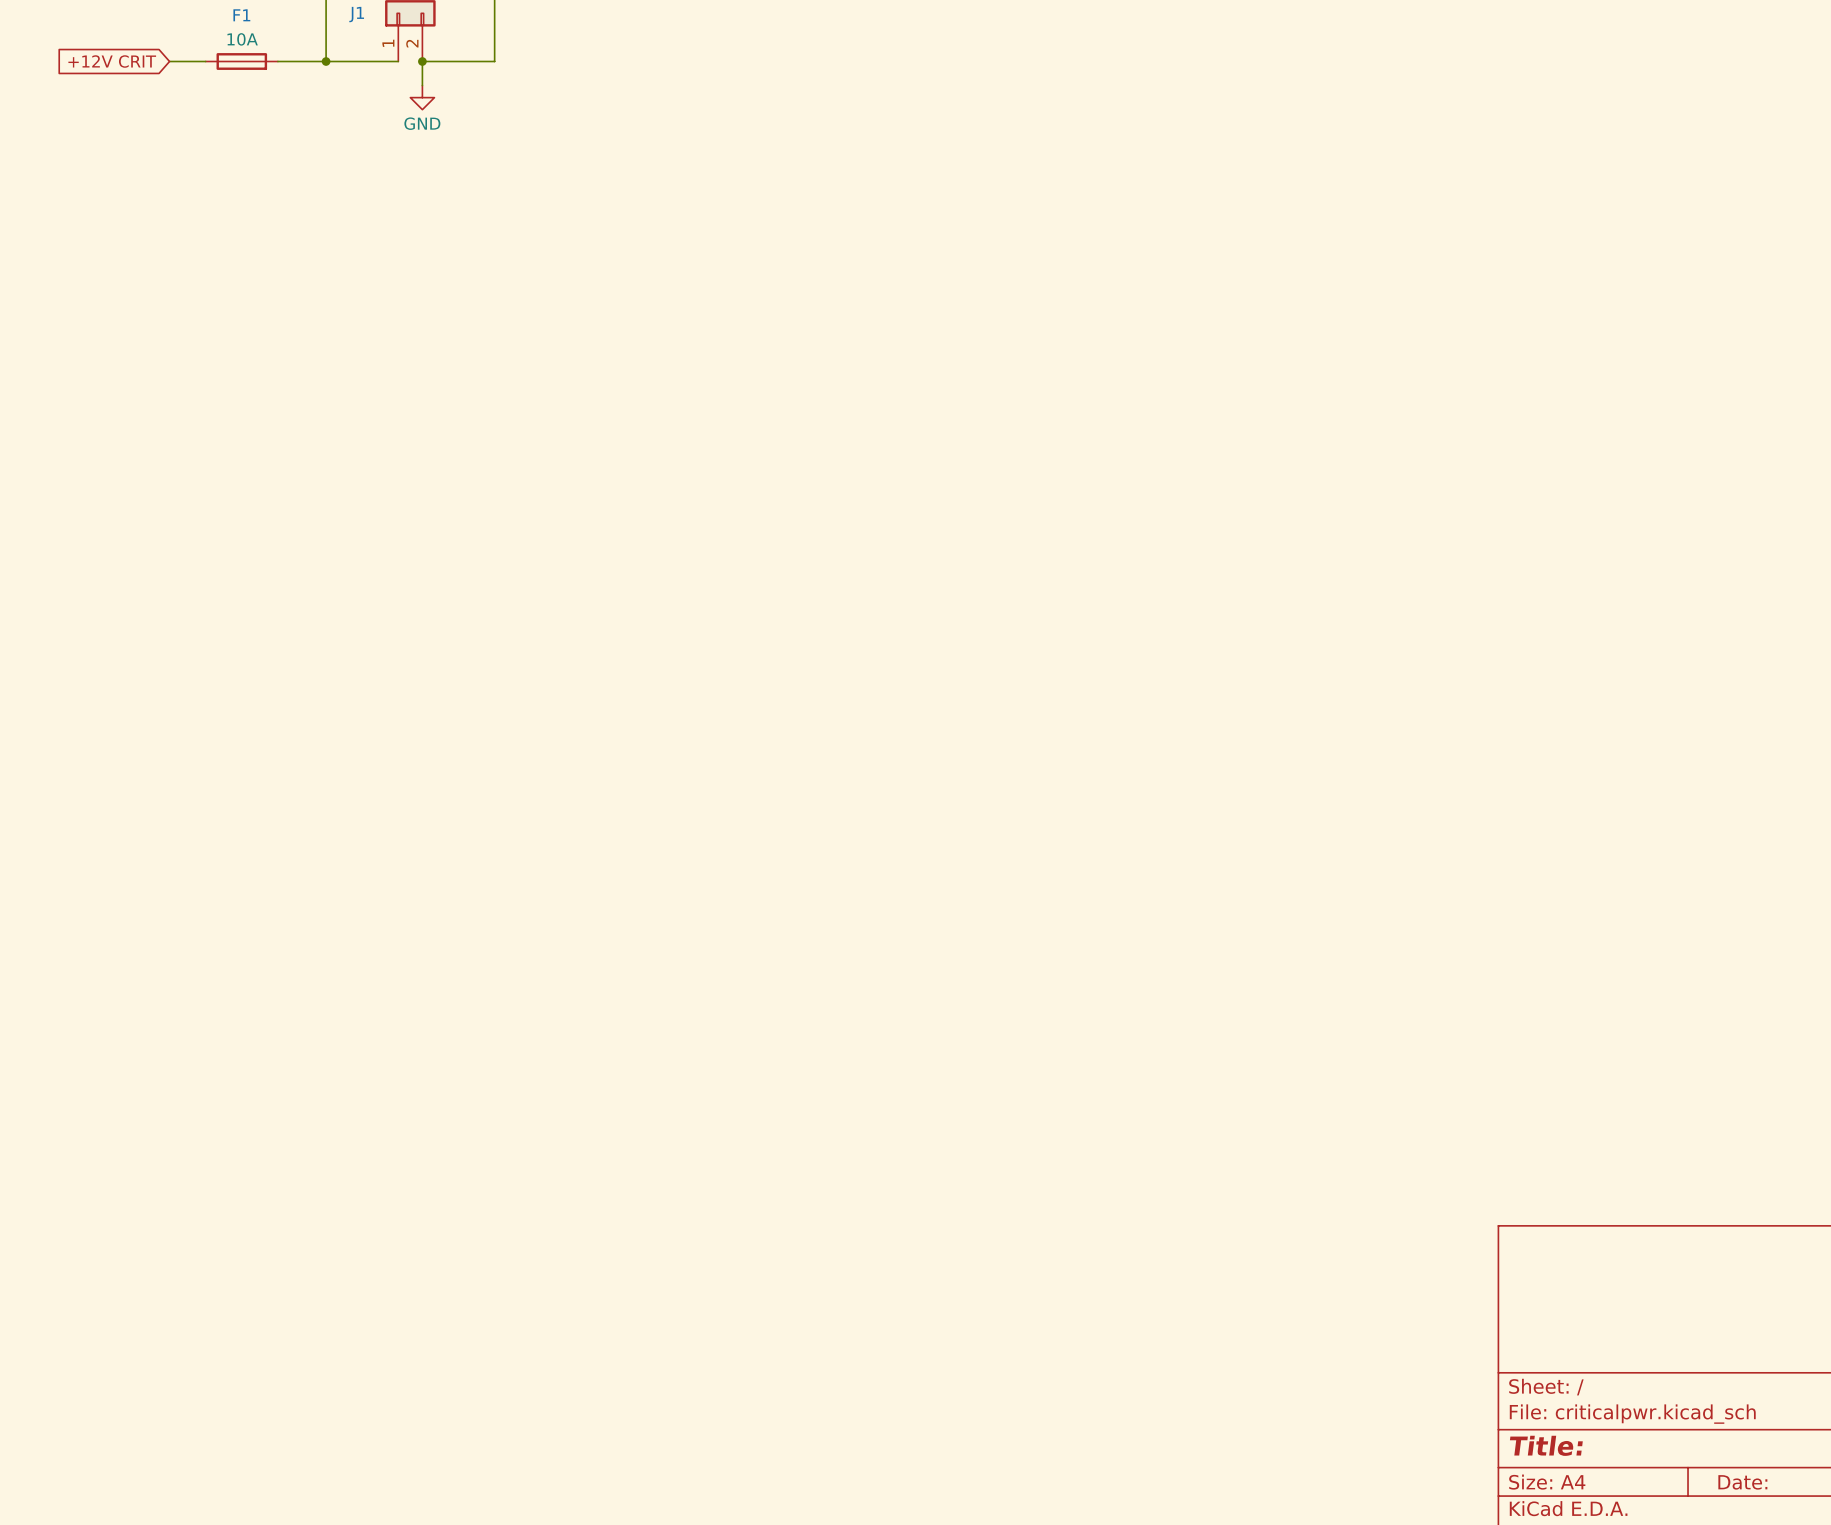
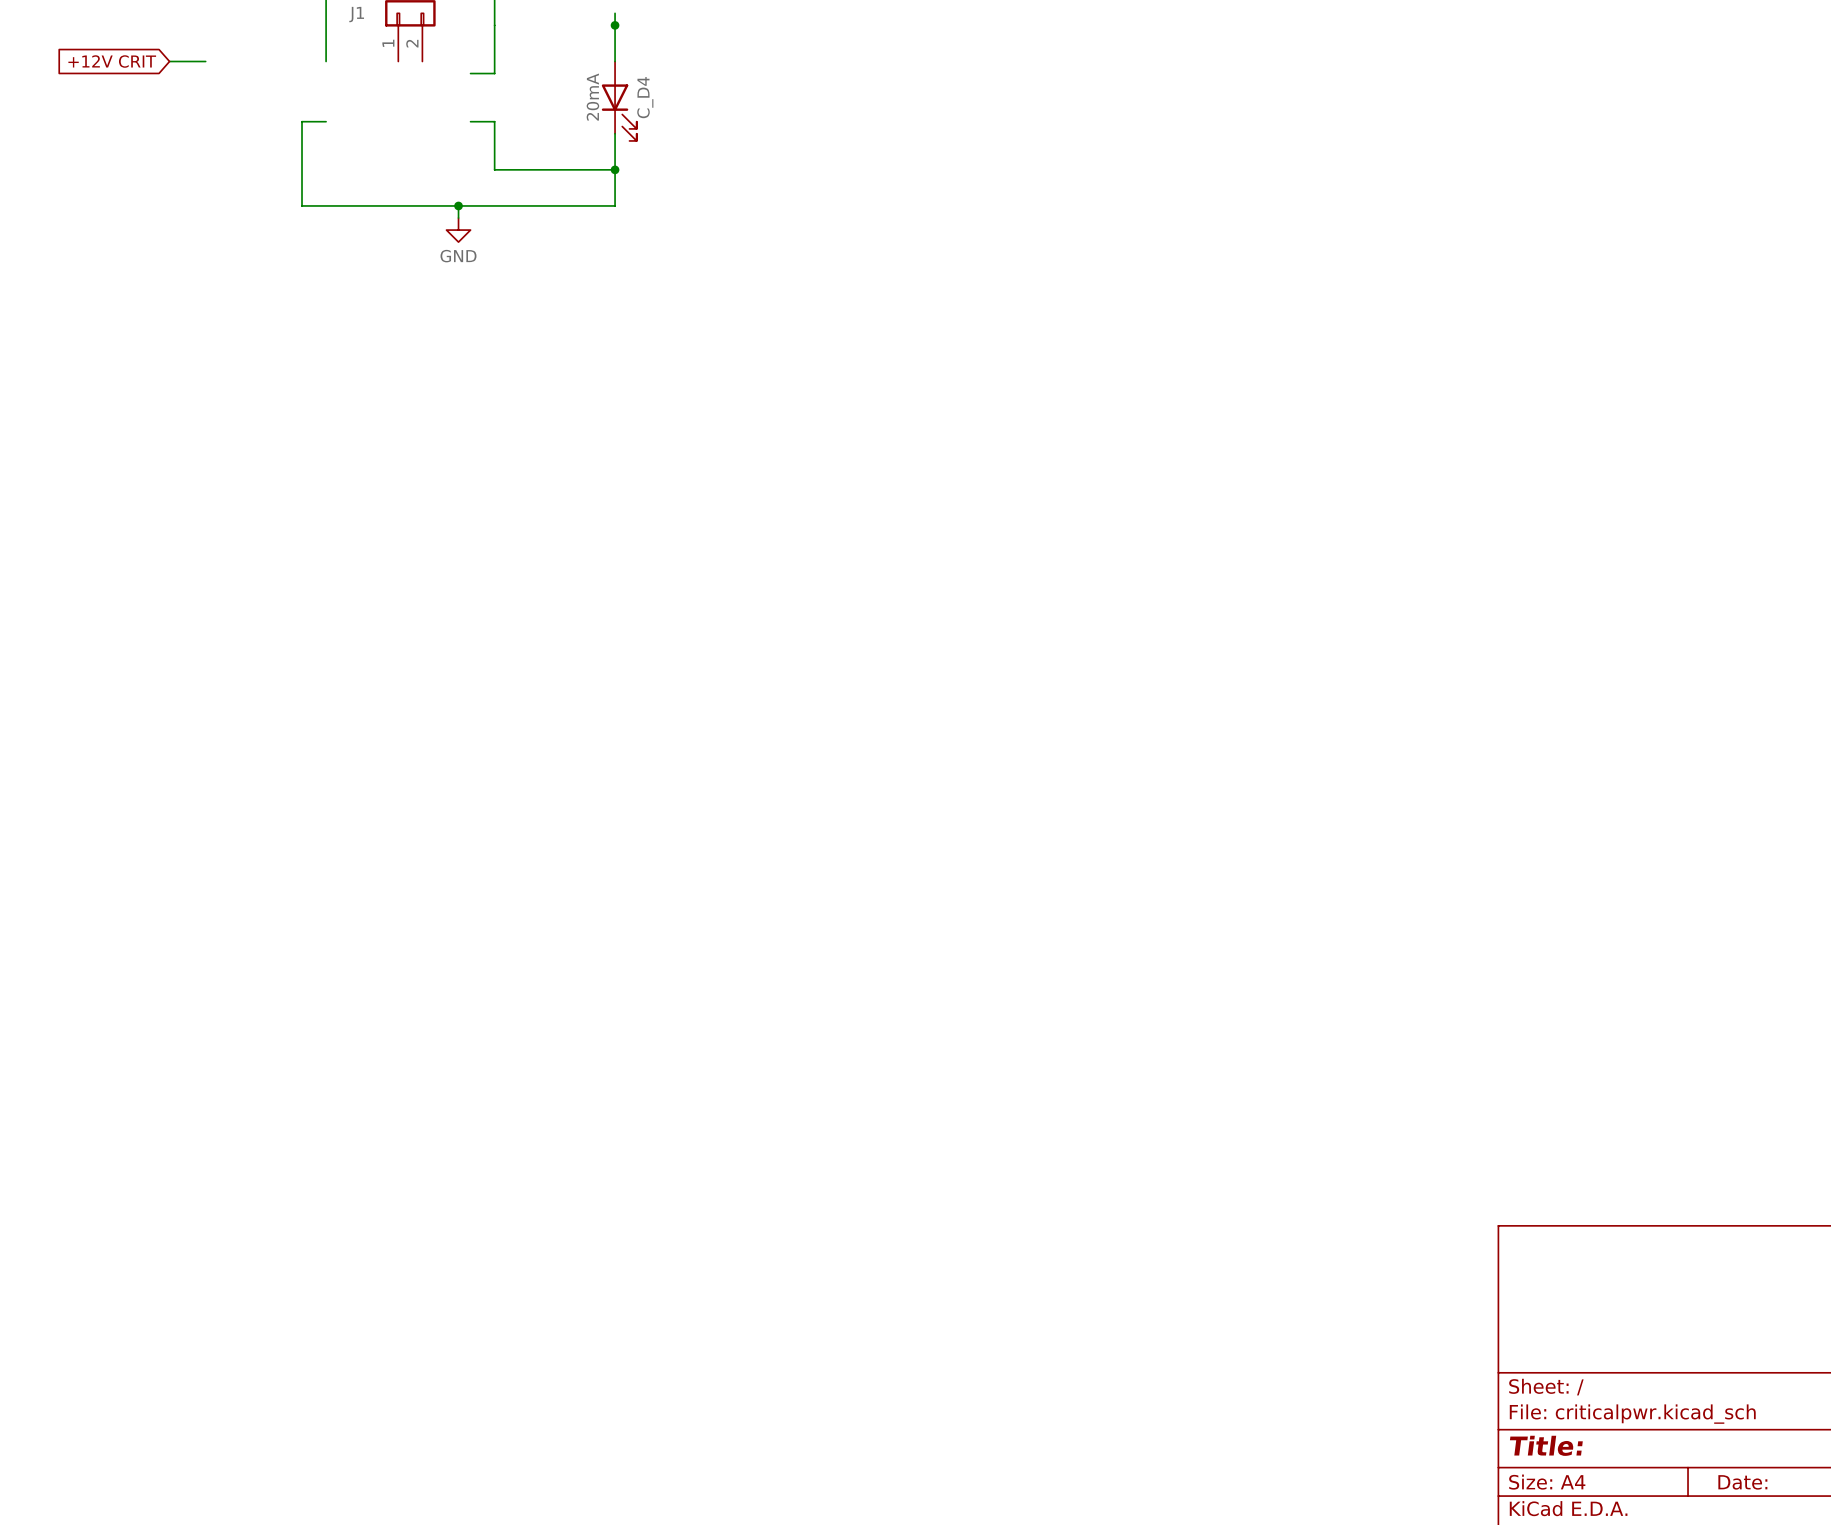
wire: none -> (615, 13) (615, 61)
junction: none -> (615, 25)
F1: 10A (241, 61) -> none
wire: (277, 61) (398, 61) -> none
junction: (326, 61) -> none
junction: (422, 61) -> none
wire: (494, 61) (422, 61) (422, 85) -> (494, 61) (494, 73) (470, 73)
power symbol position: GND (422, 97) -> GND (458, 230)
C_D4: none -> 20mA (619, 101)
wire: none -> (326, 121) (302, 121) (302, 205) (615, 205) (615, 133)
wire: none -> (470, 121) (494, 121) (494, 169) (615, 169)
junction: none -> (615, 169)
wire: none -> (458, 205) (458, 218)
junction: none -> (458, 205)

